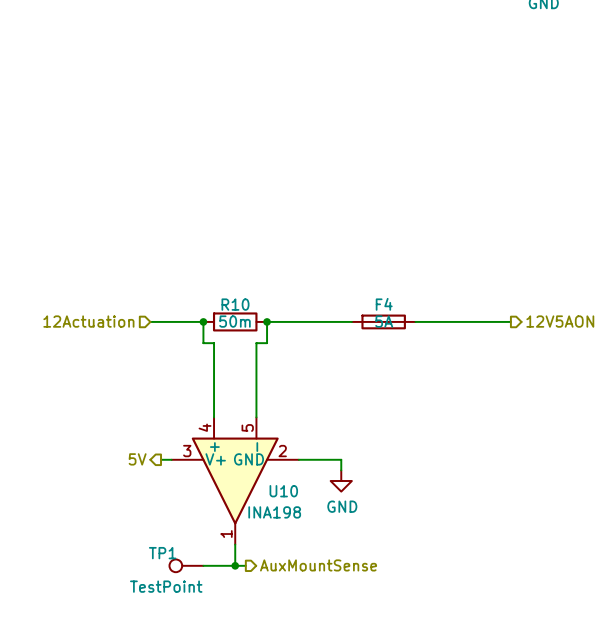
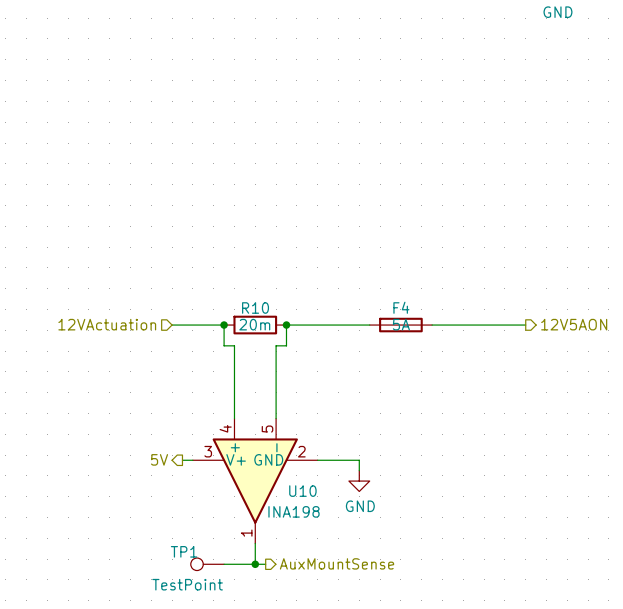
hierarchical label: 12Actuation (88, 321) -> 12VActuation (107, 324)
R10 value: 50m (234, 321) -> 20m (254, 324)

